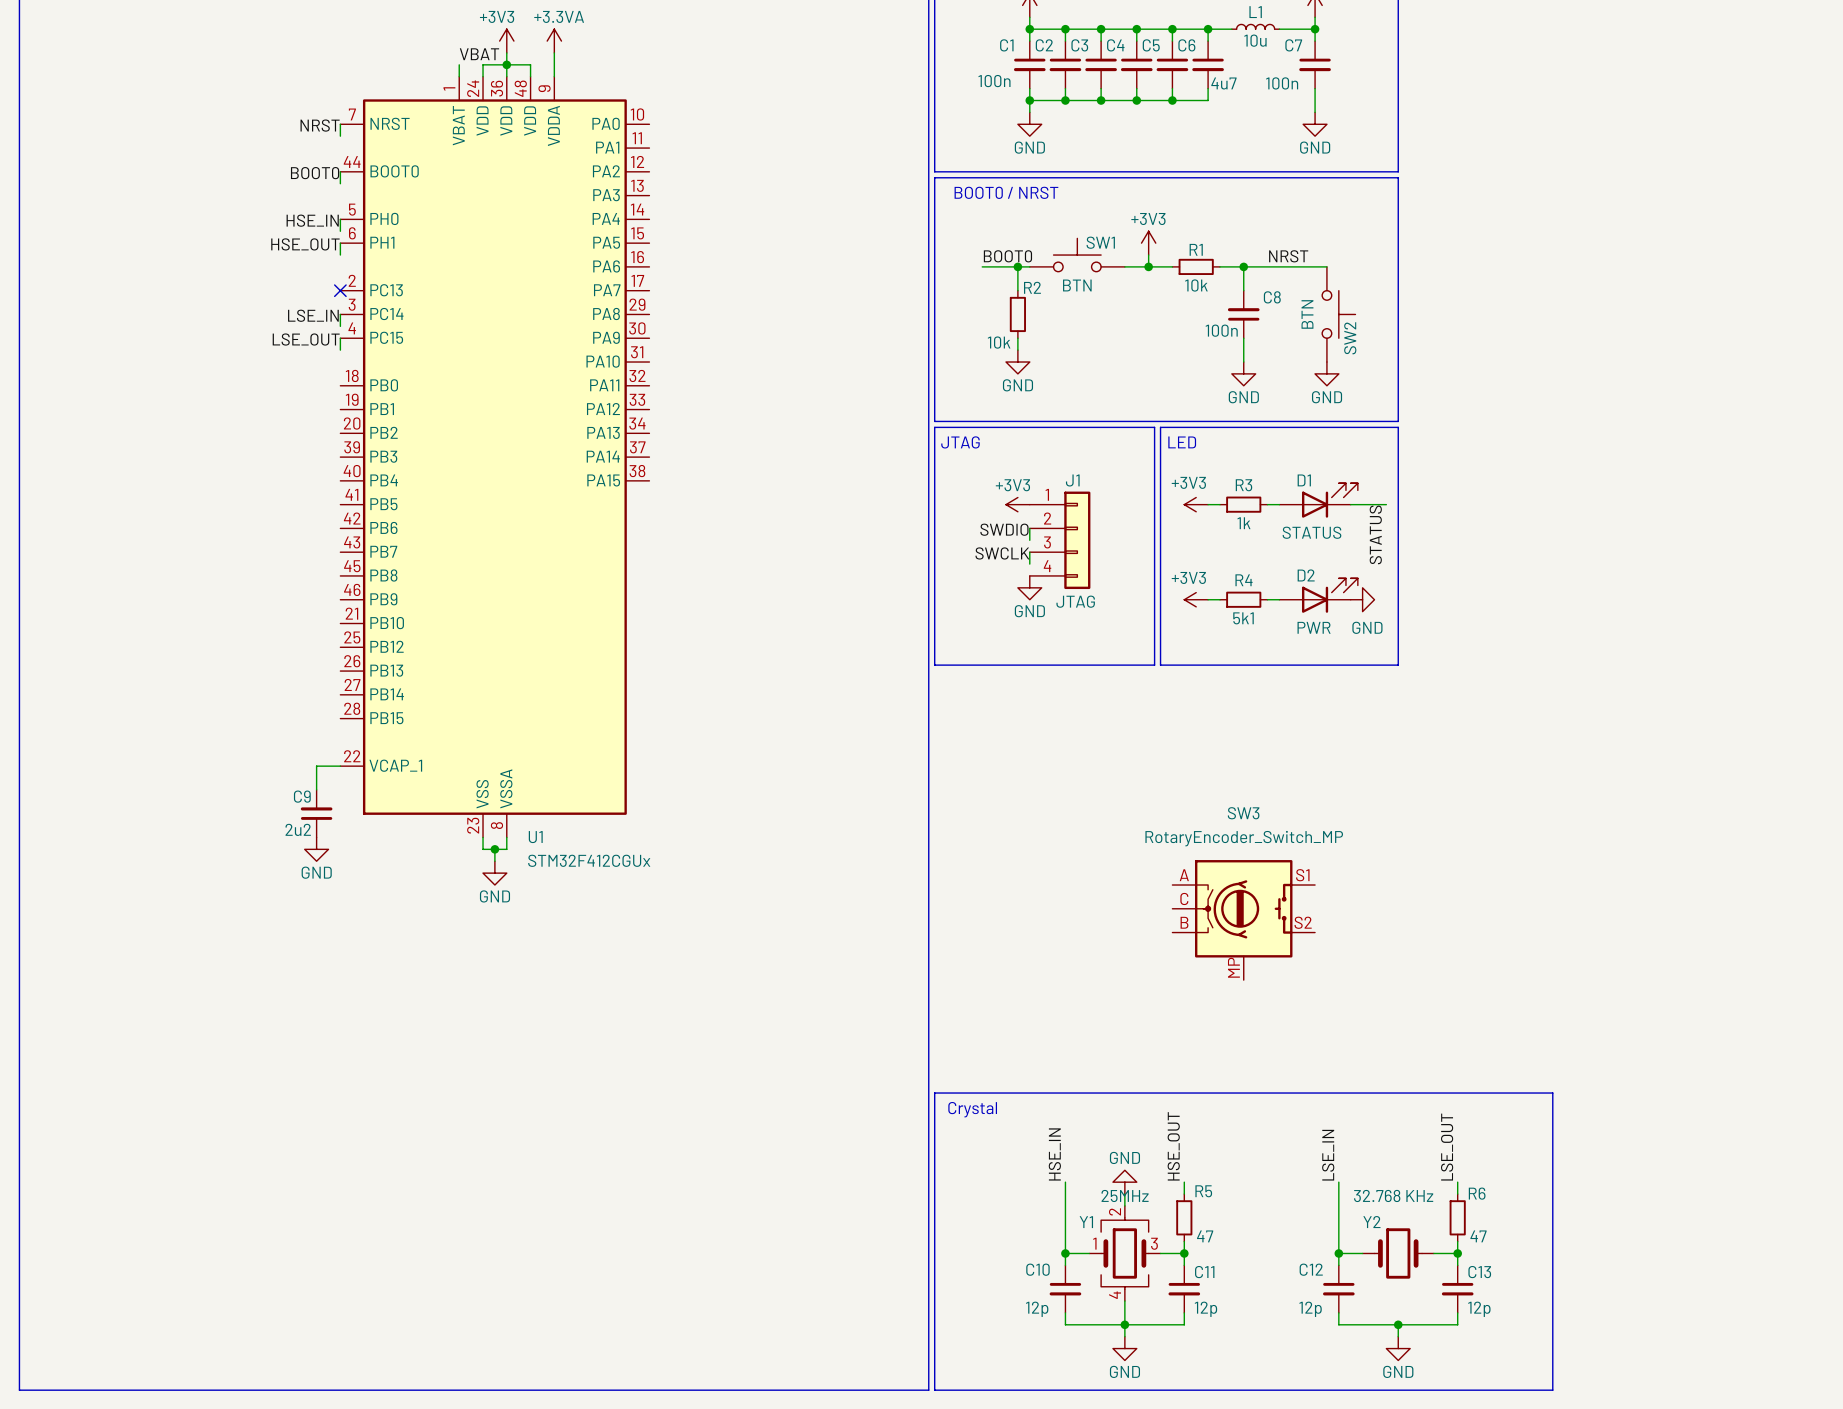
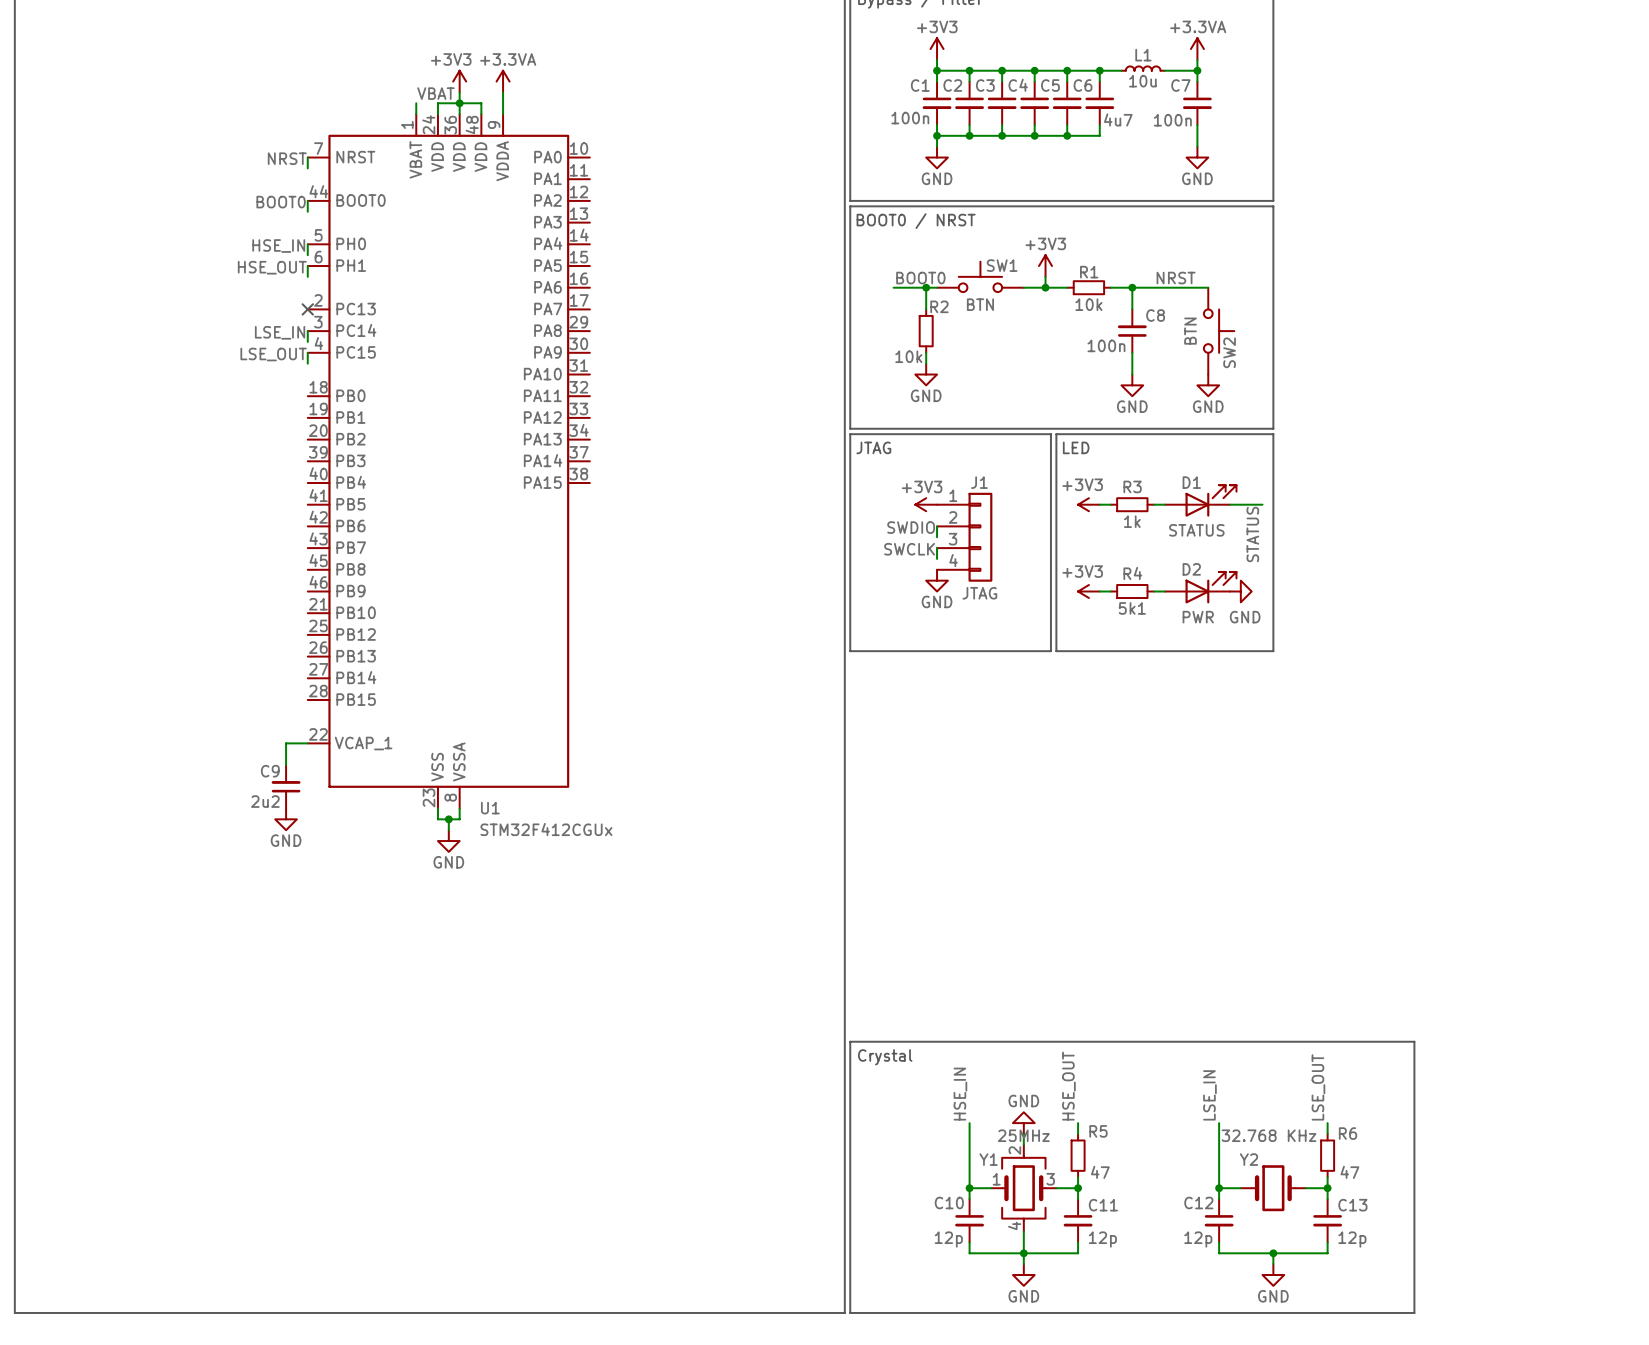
SW3: RotaryEncoder_Switch_MP (1243, 920) -> none

